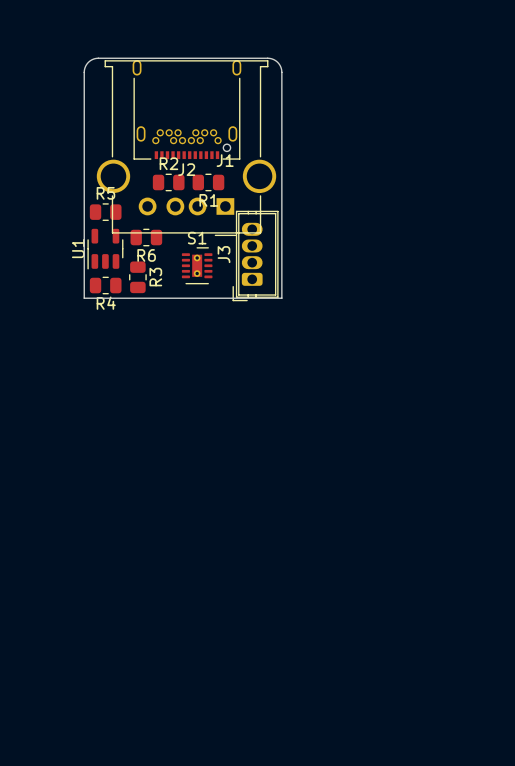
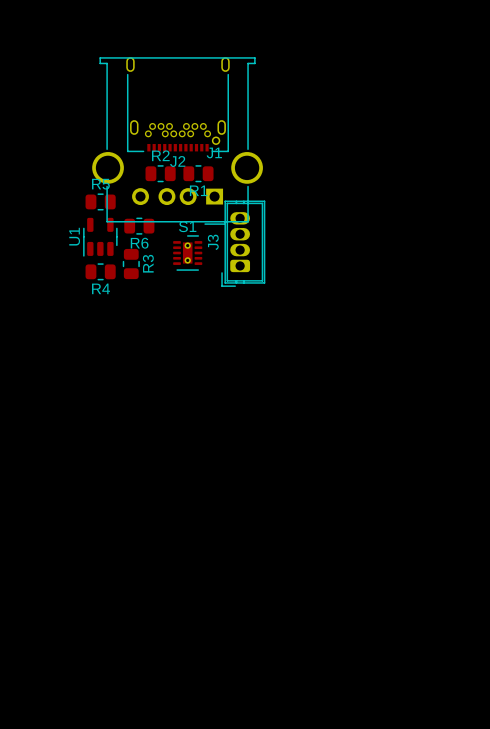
board edge: (98, 58) (267, 58) (278, 63) (281, 72) (281, 298) (84, 298) (84, 70) (89, 61) (98, 58) -> none

